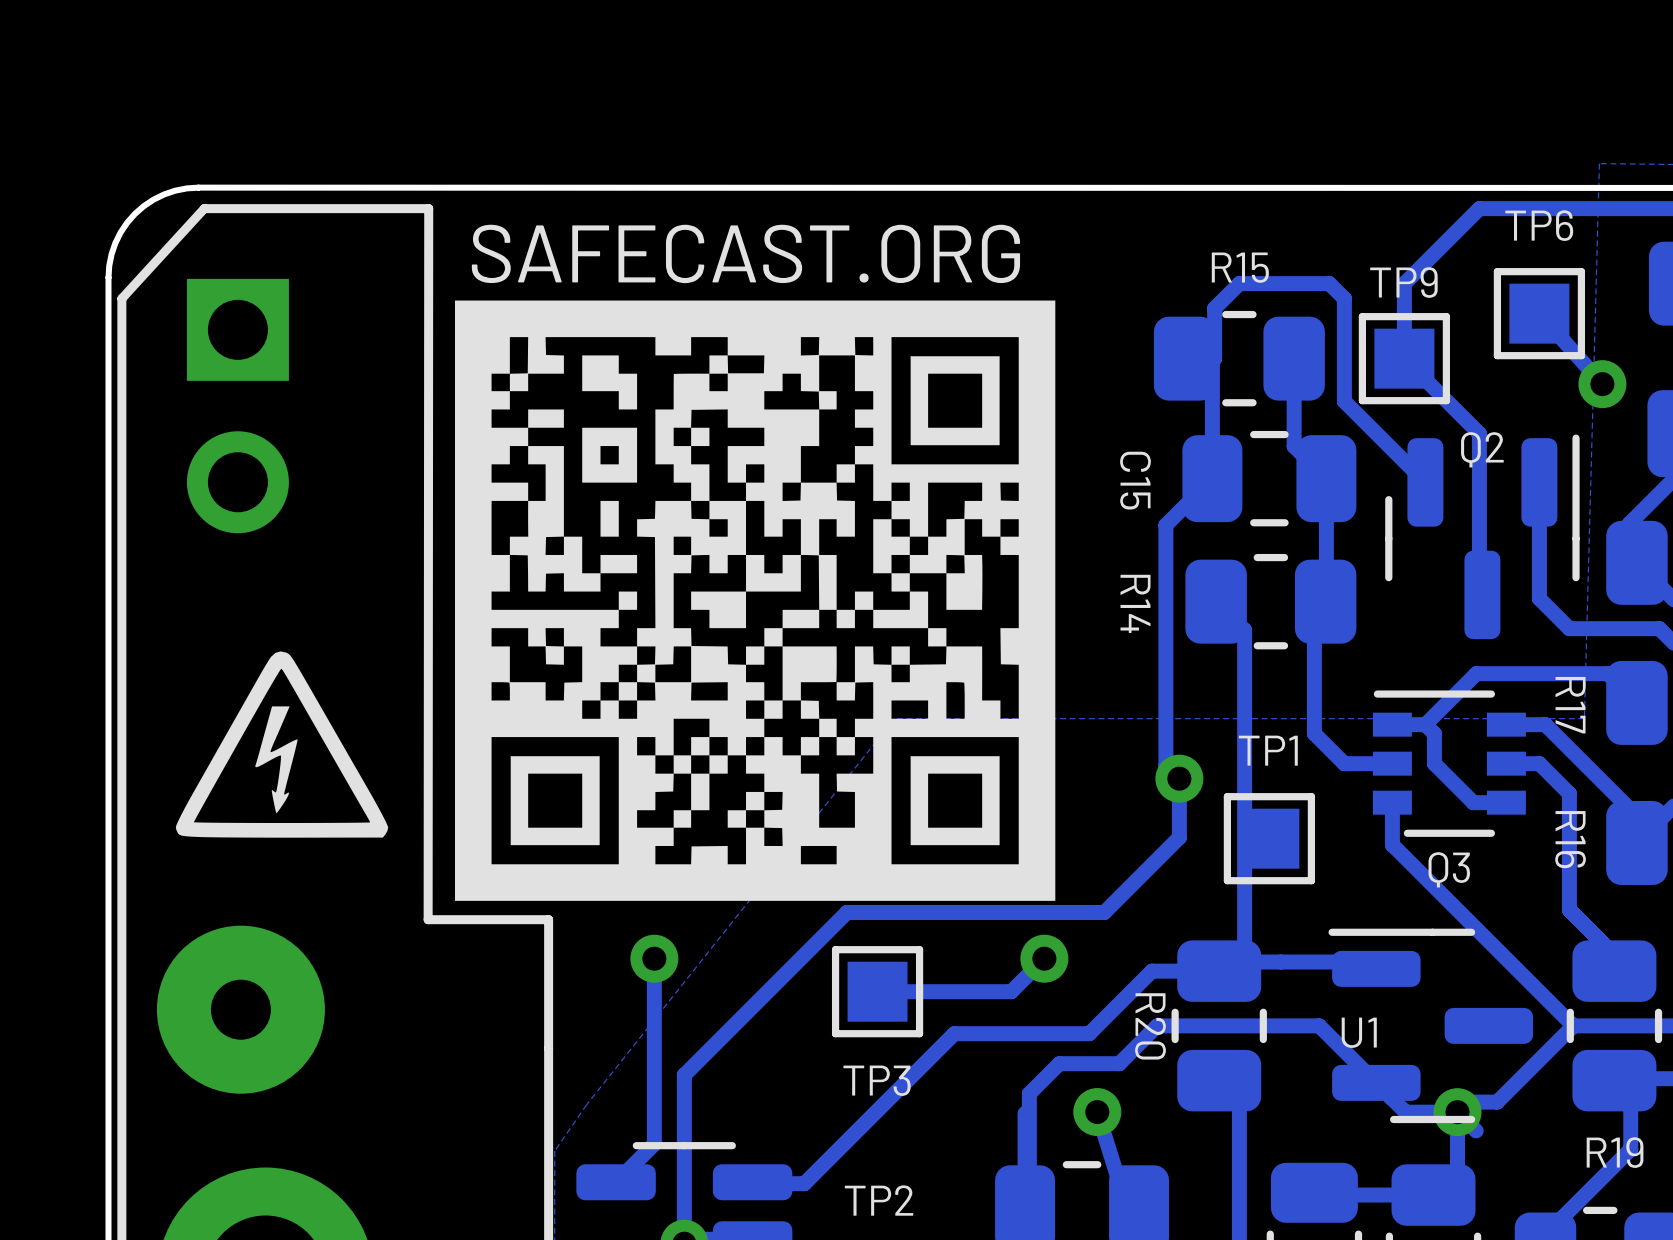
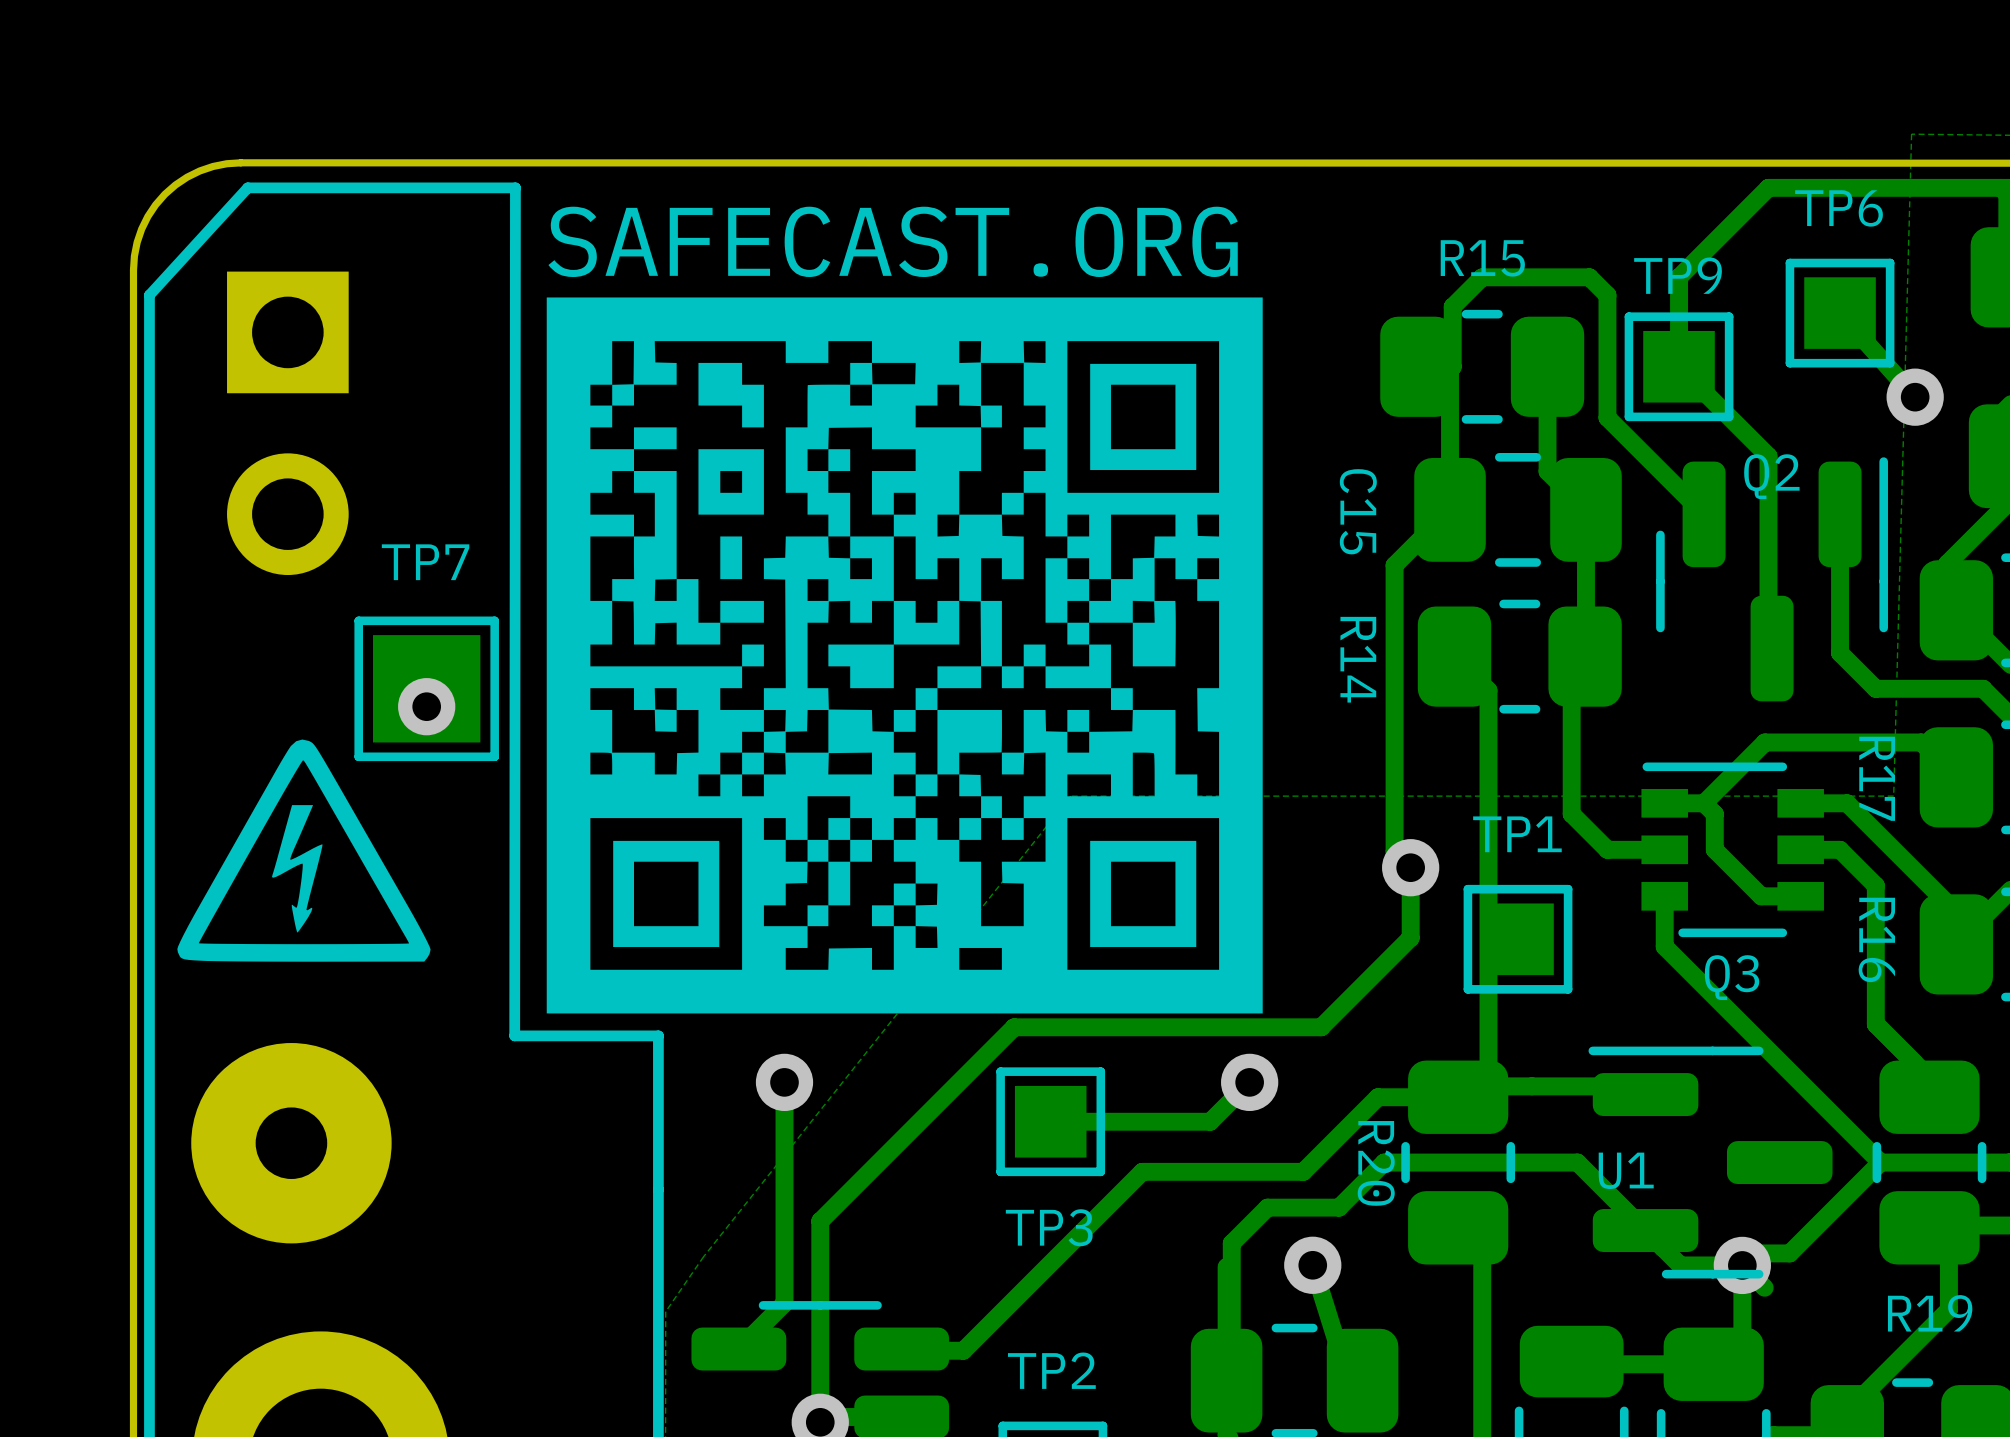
TP7: none -> (426, 688)
via: none -> (426, 706)
drawing position: (282, 744) -> (303, 850)

